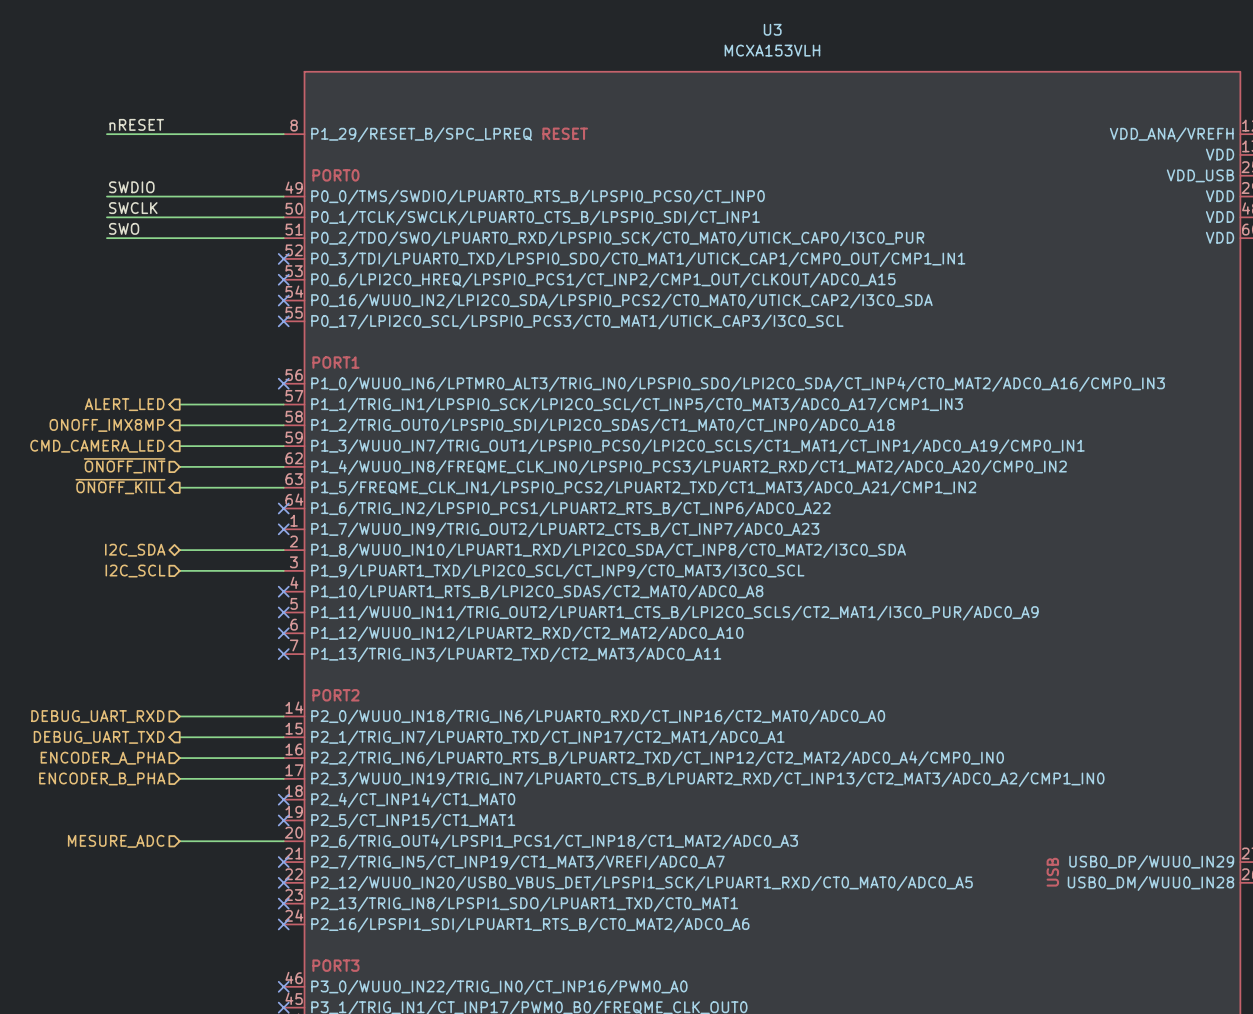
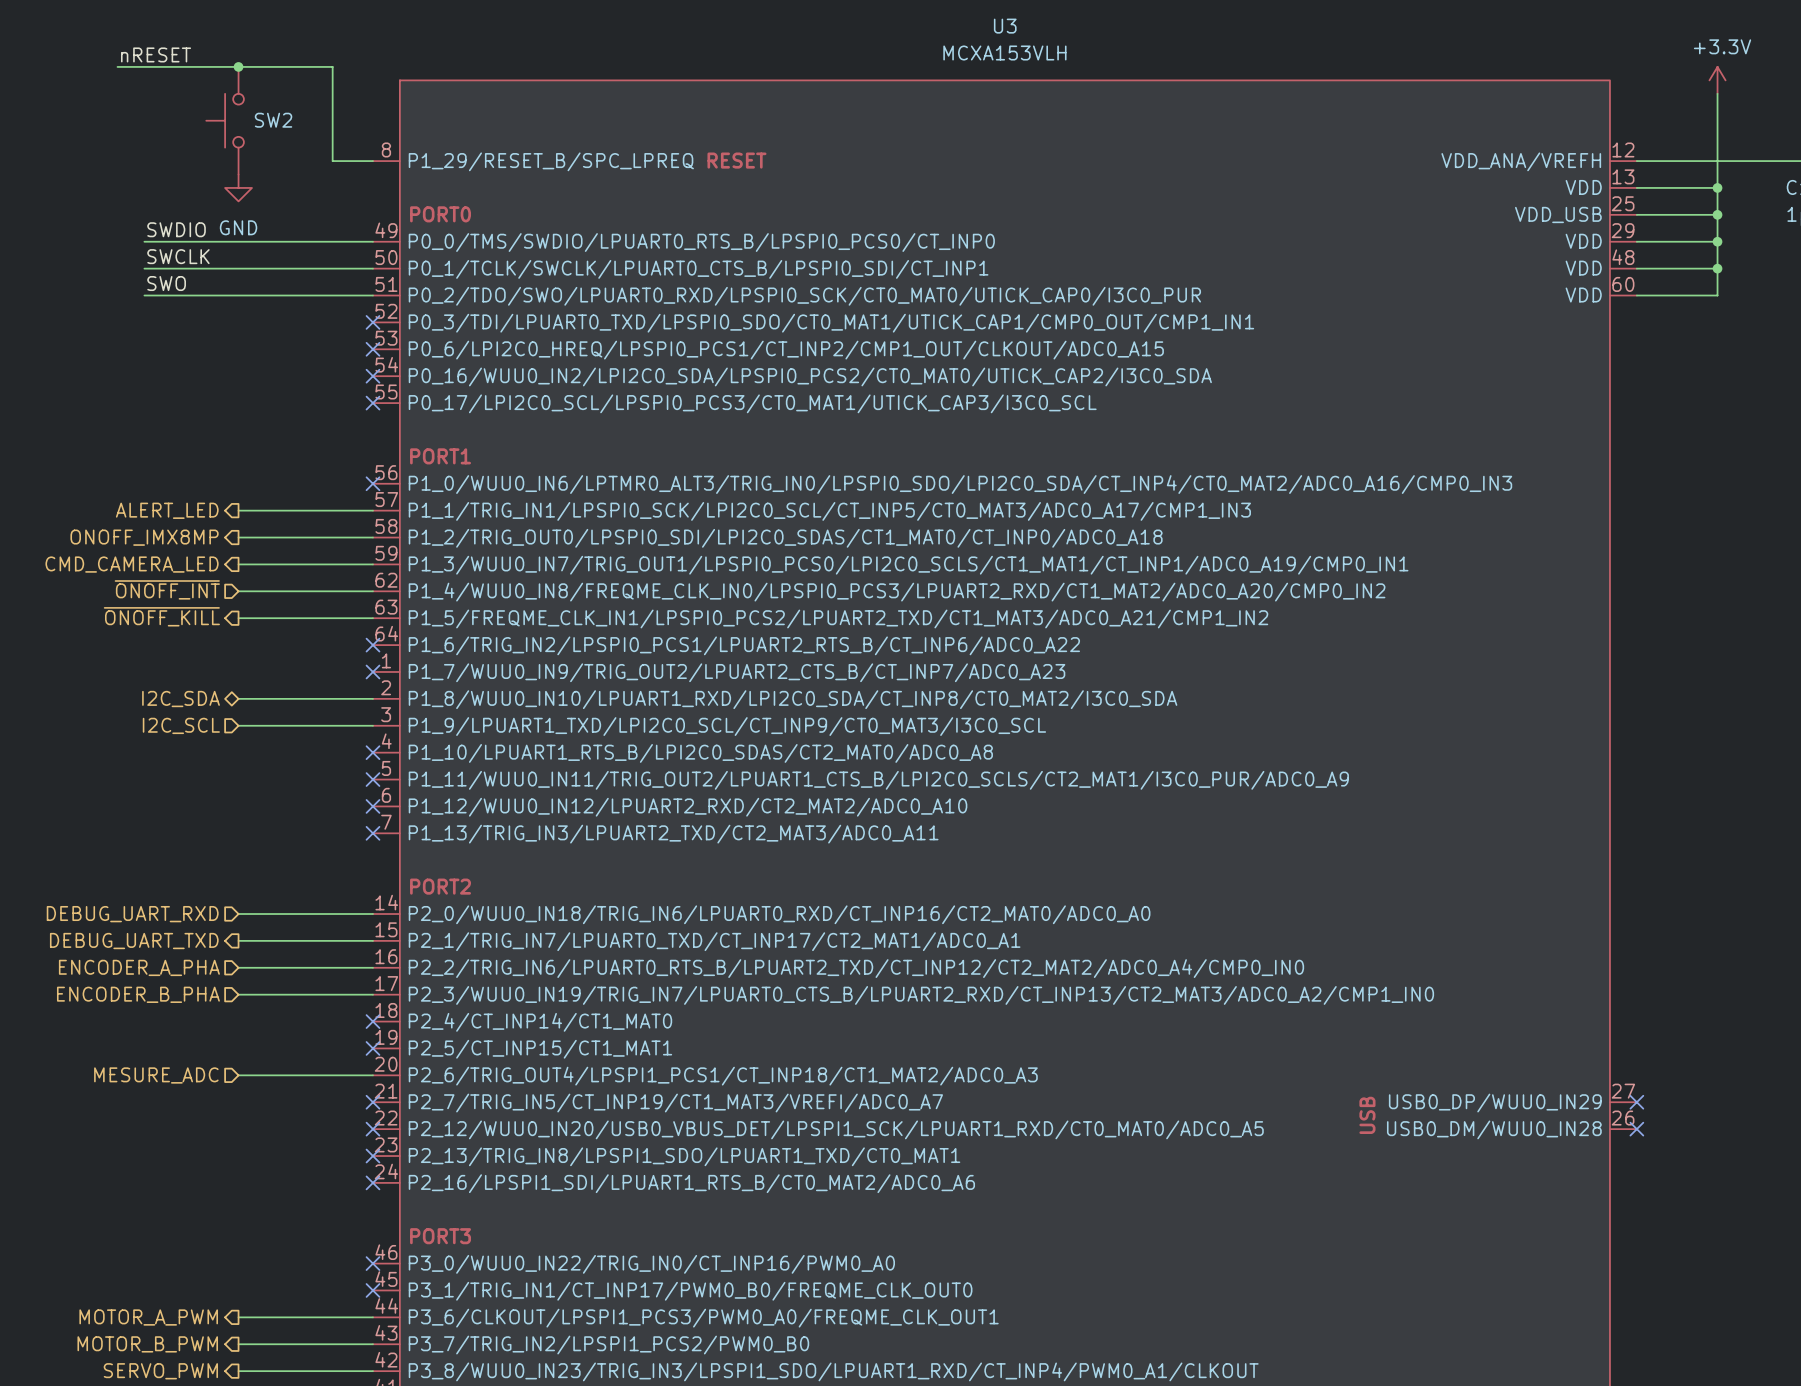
junction: none -> (238, 66)
SW2: none -> (225, 120)
label position: nRESET (136, 124) -> nRESET (156, 54)
wire: (106, 134) (252, 134) -> (117, 66) (332, 66) (332, 161)
power symbol: none -> GND (238, 187)

